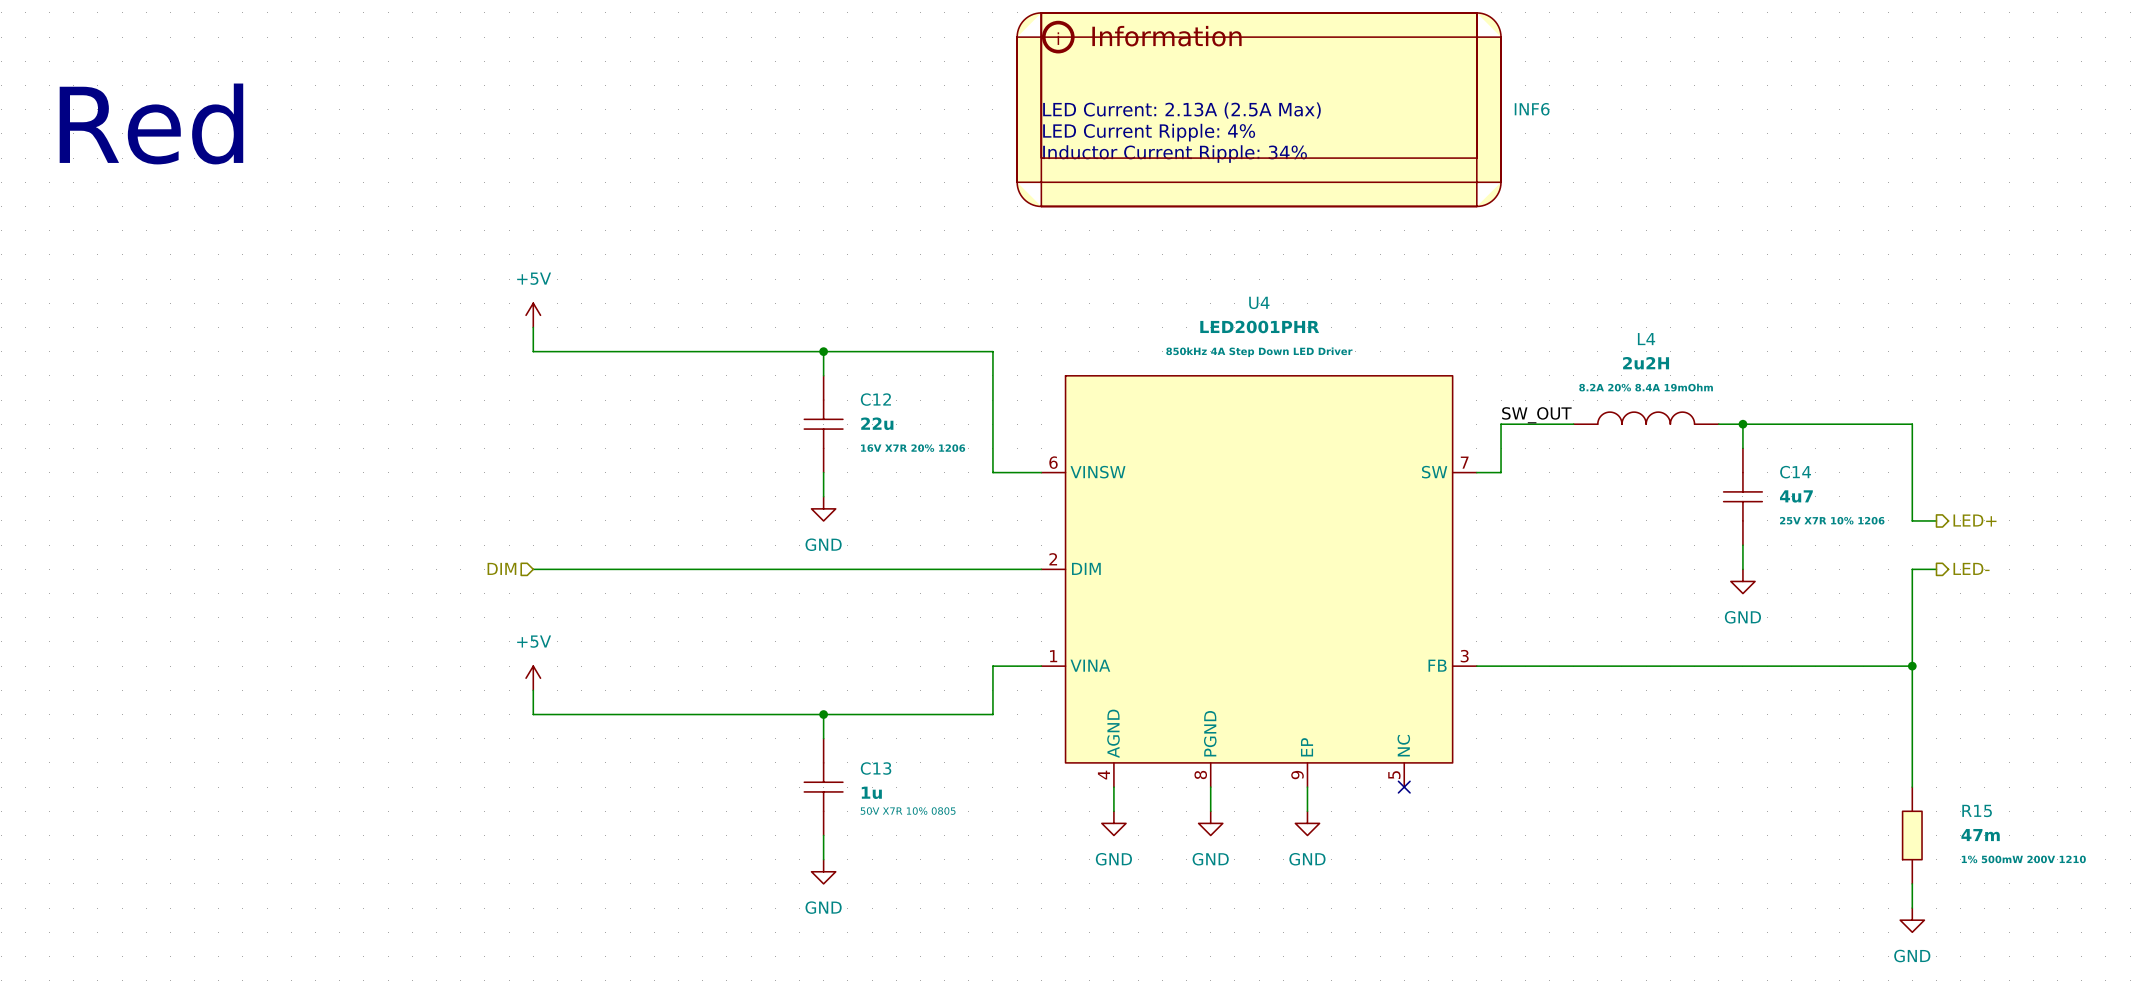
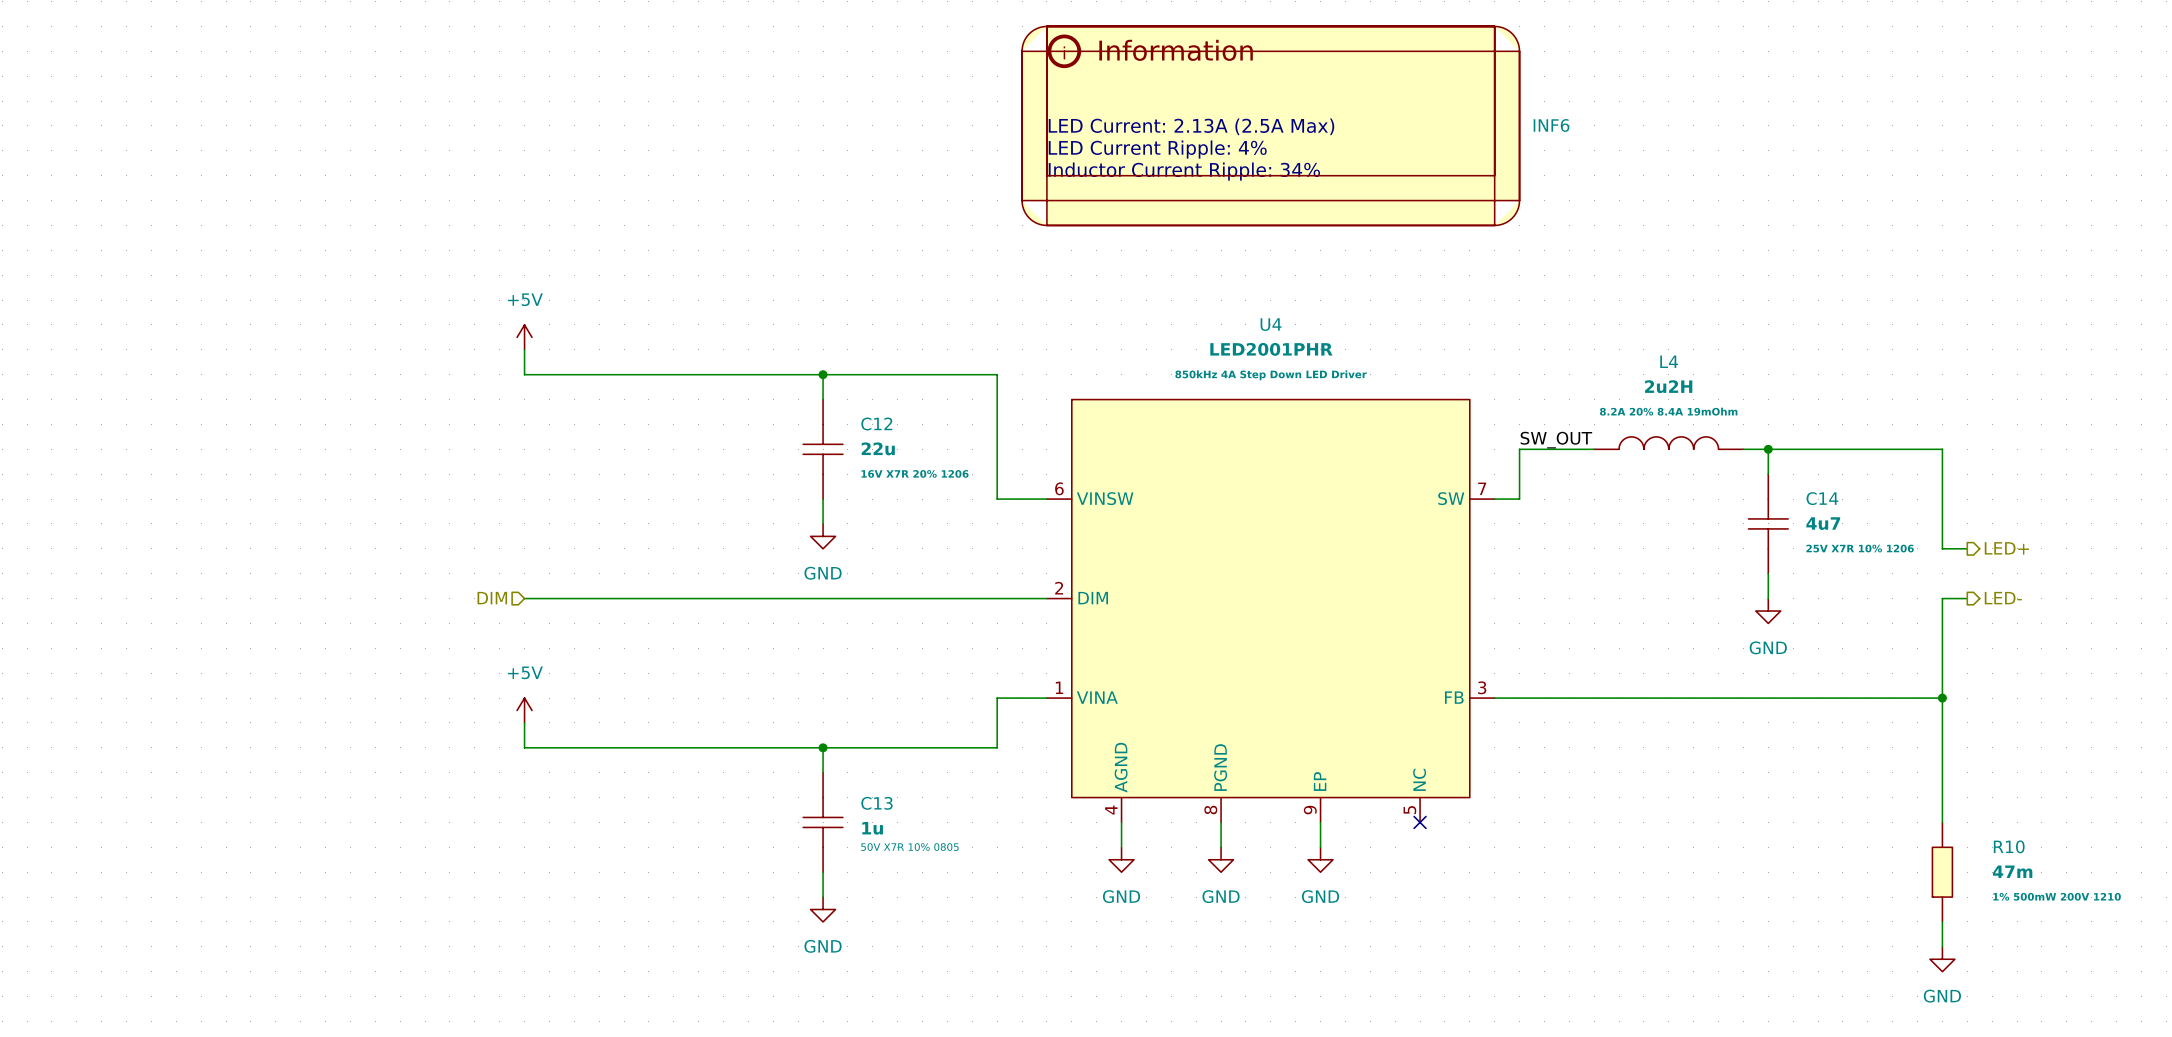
text: Red (151, 123) -> none
R15 name: R15 (1977, 810) -> R10 (2009, 846)

